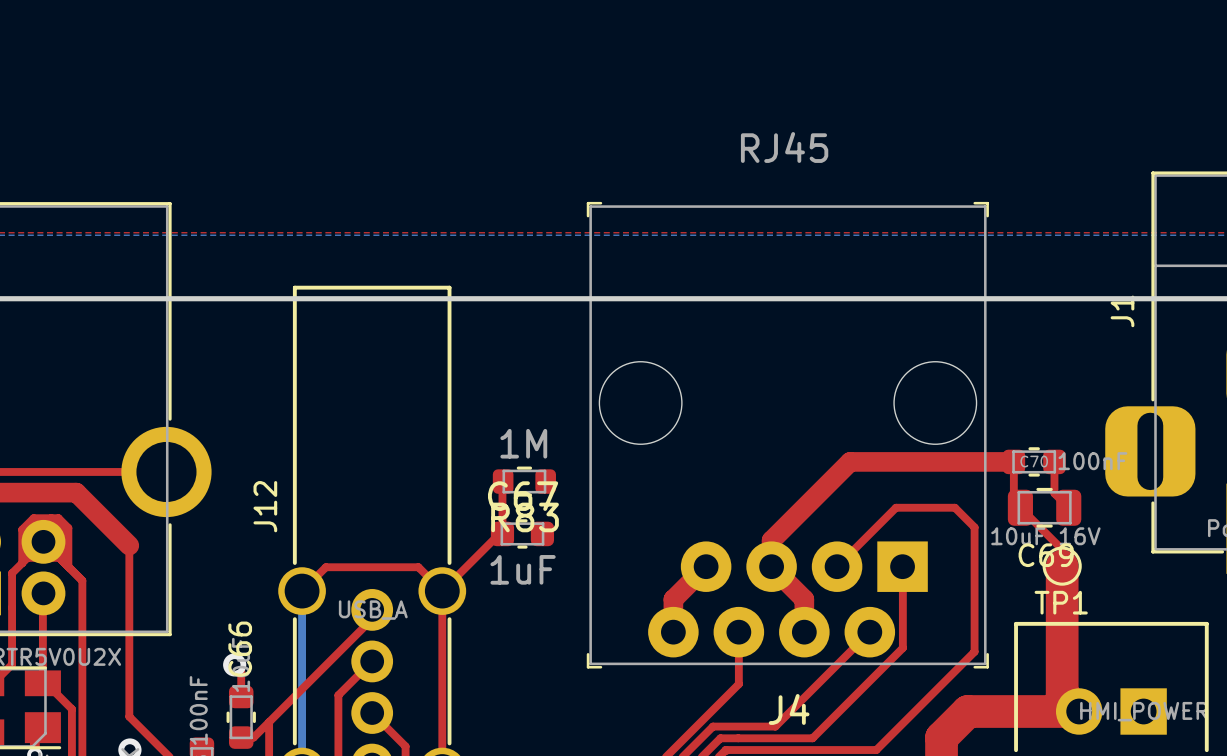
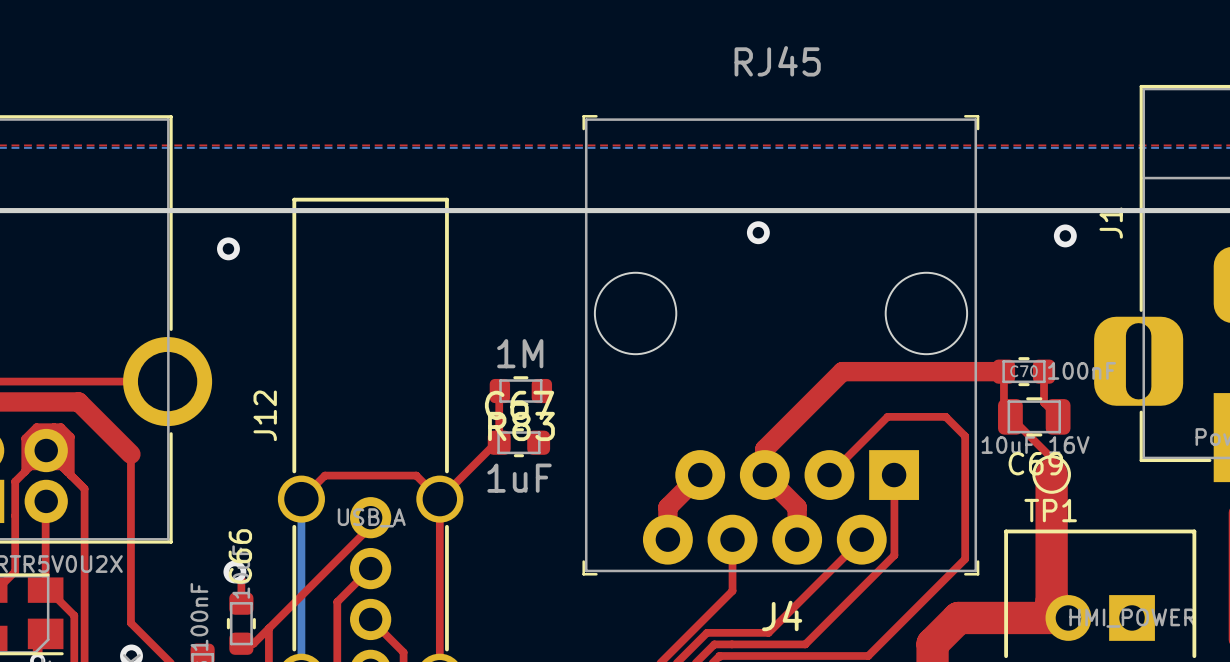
via: none -> (758, 232)
via: none -> (1065, 235)
via: none -> (228, 248)

